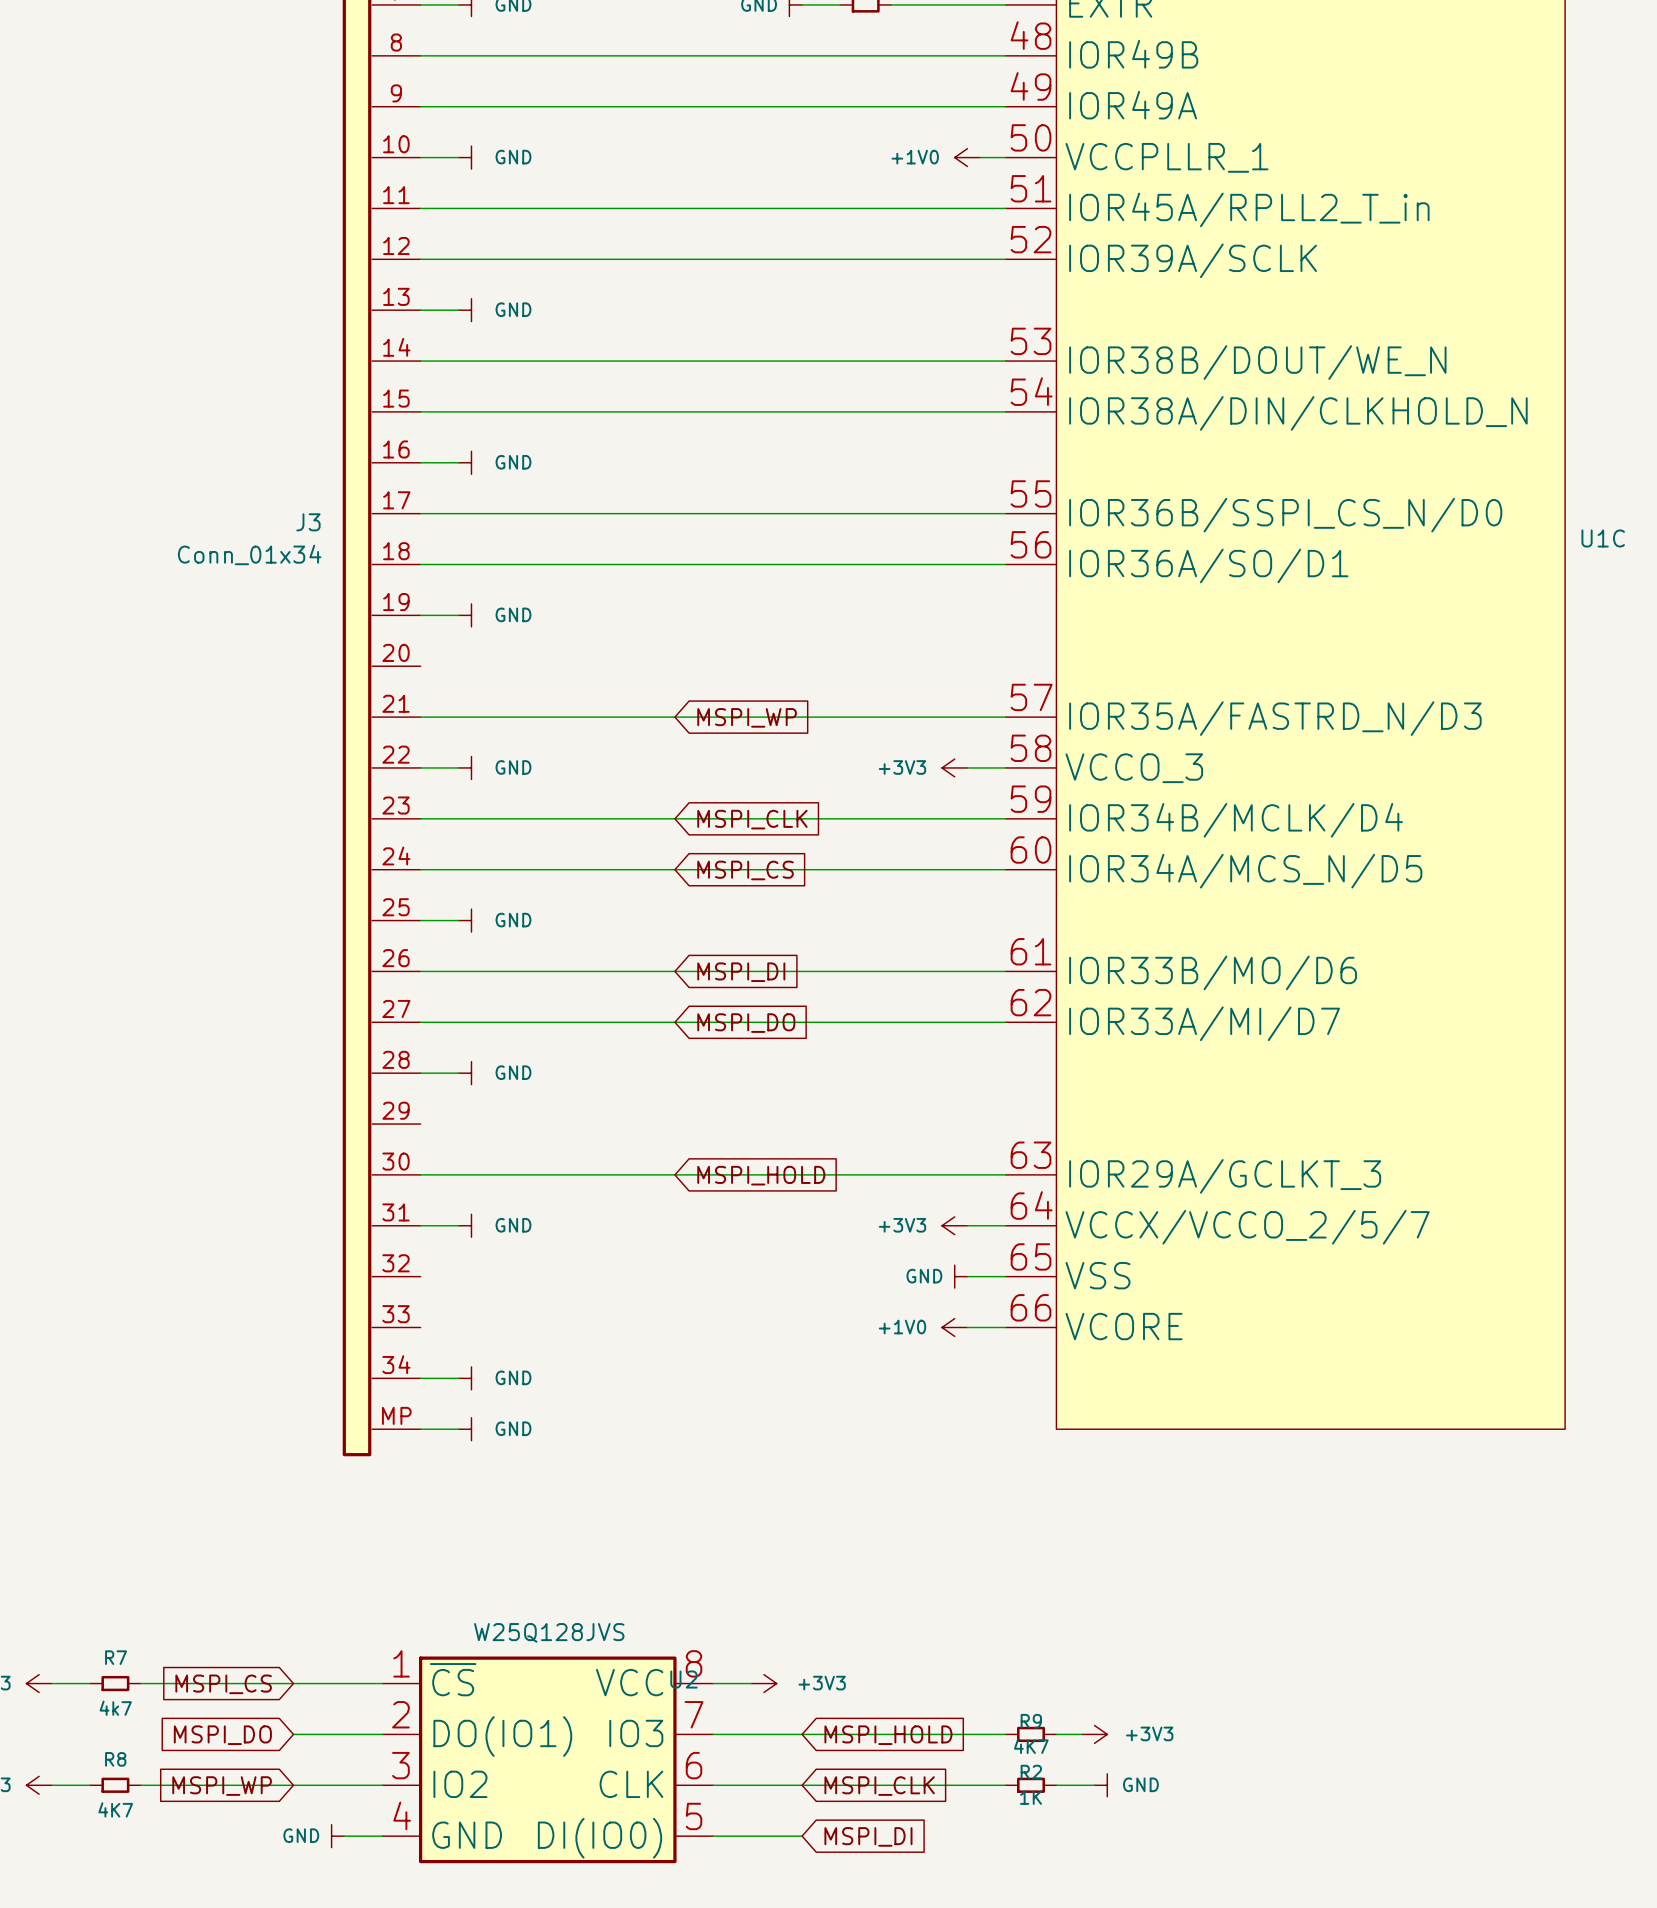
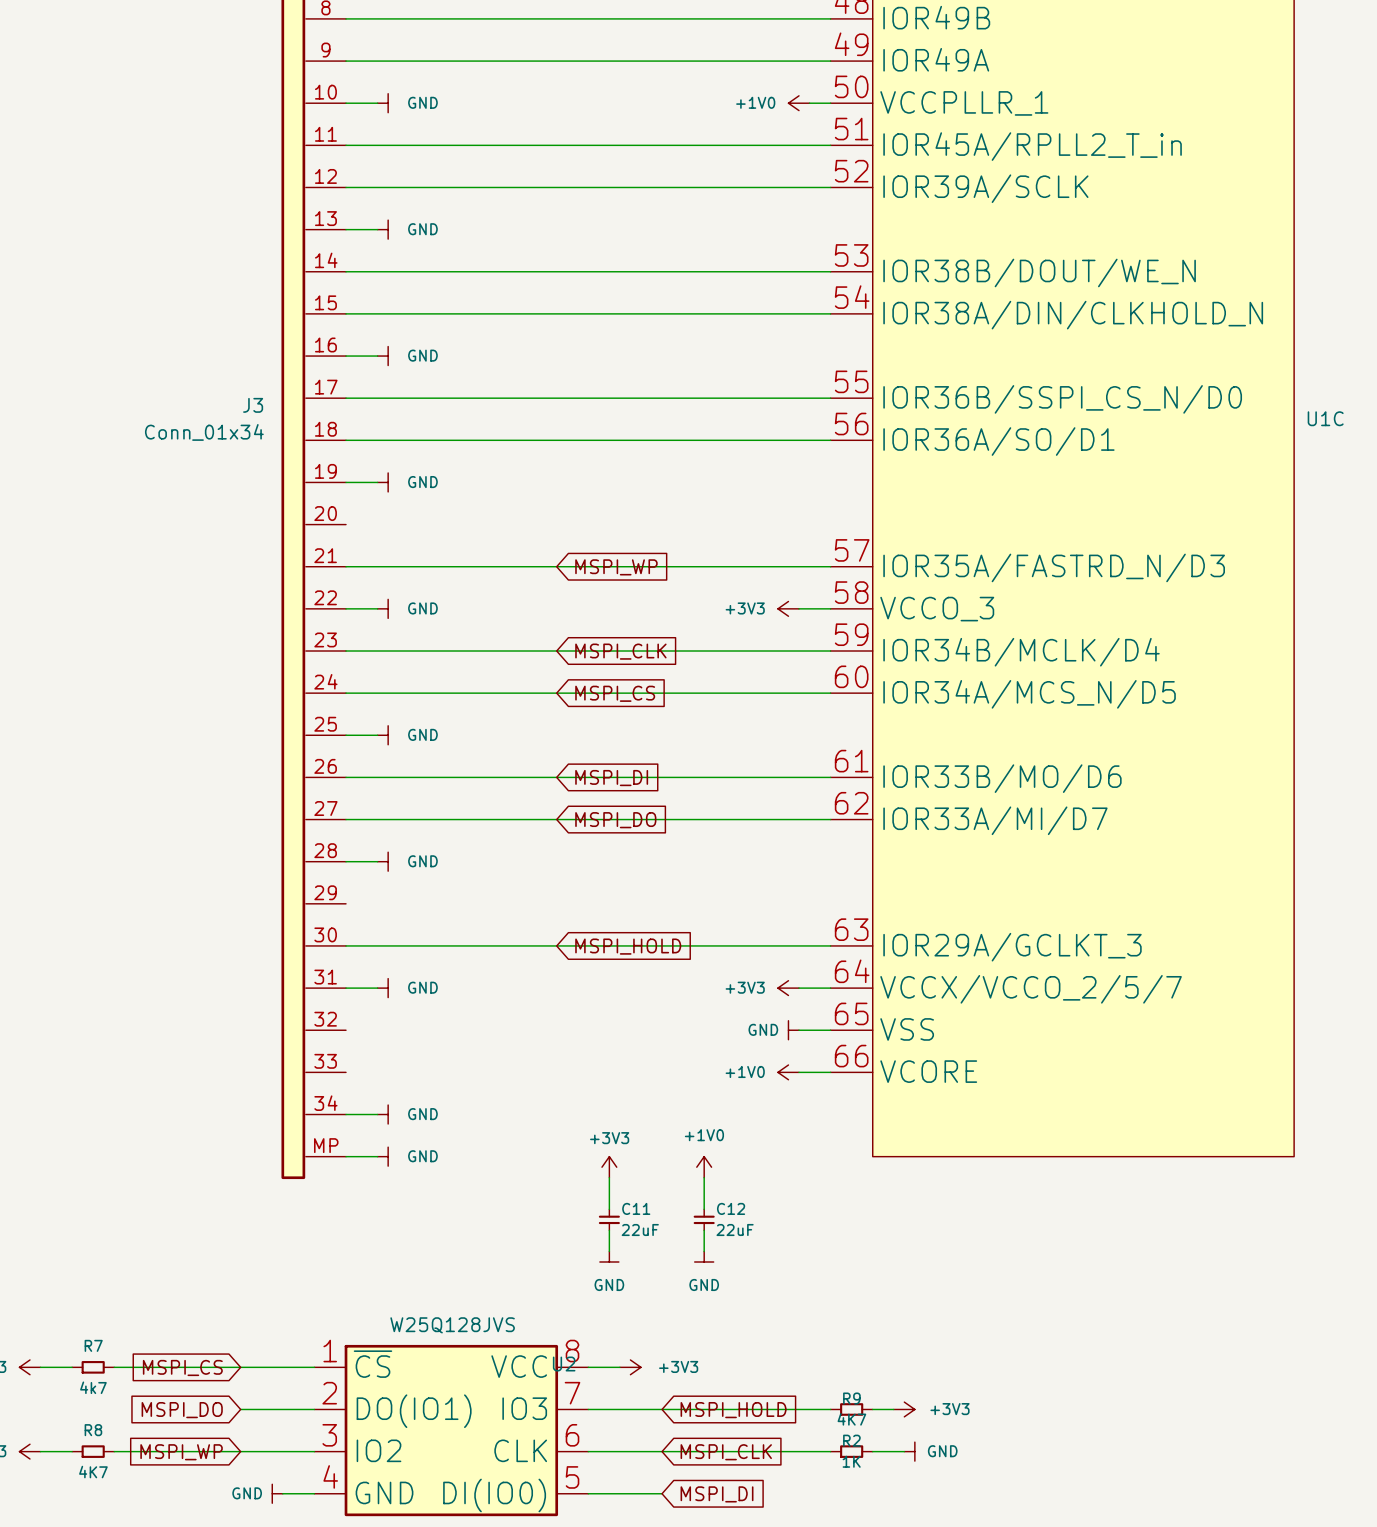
power symbol: none -> +3V3 (609, 1167)
power symbol: none -> +1V0 (704, 1167)
wire: none -> (609, 1177) (609, 1209)
wire: none -> (704, 1177) (704, 1209)
C11: none -> 22uF (609, 1219)
C12: none -> 22uF (704, 1219)
wire: none -> (609, 1230) (609, 1251)
wire: none -> (704, 1230) (704, 1251)
power symbol: none -> GND (609, 1256)
power symbol: none -> GND (704, 1256)

